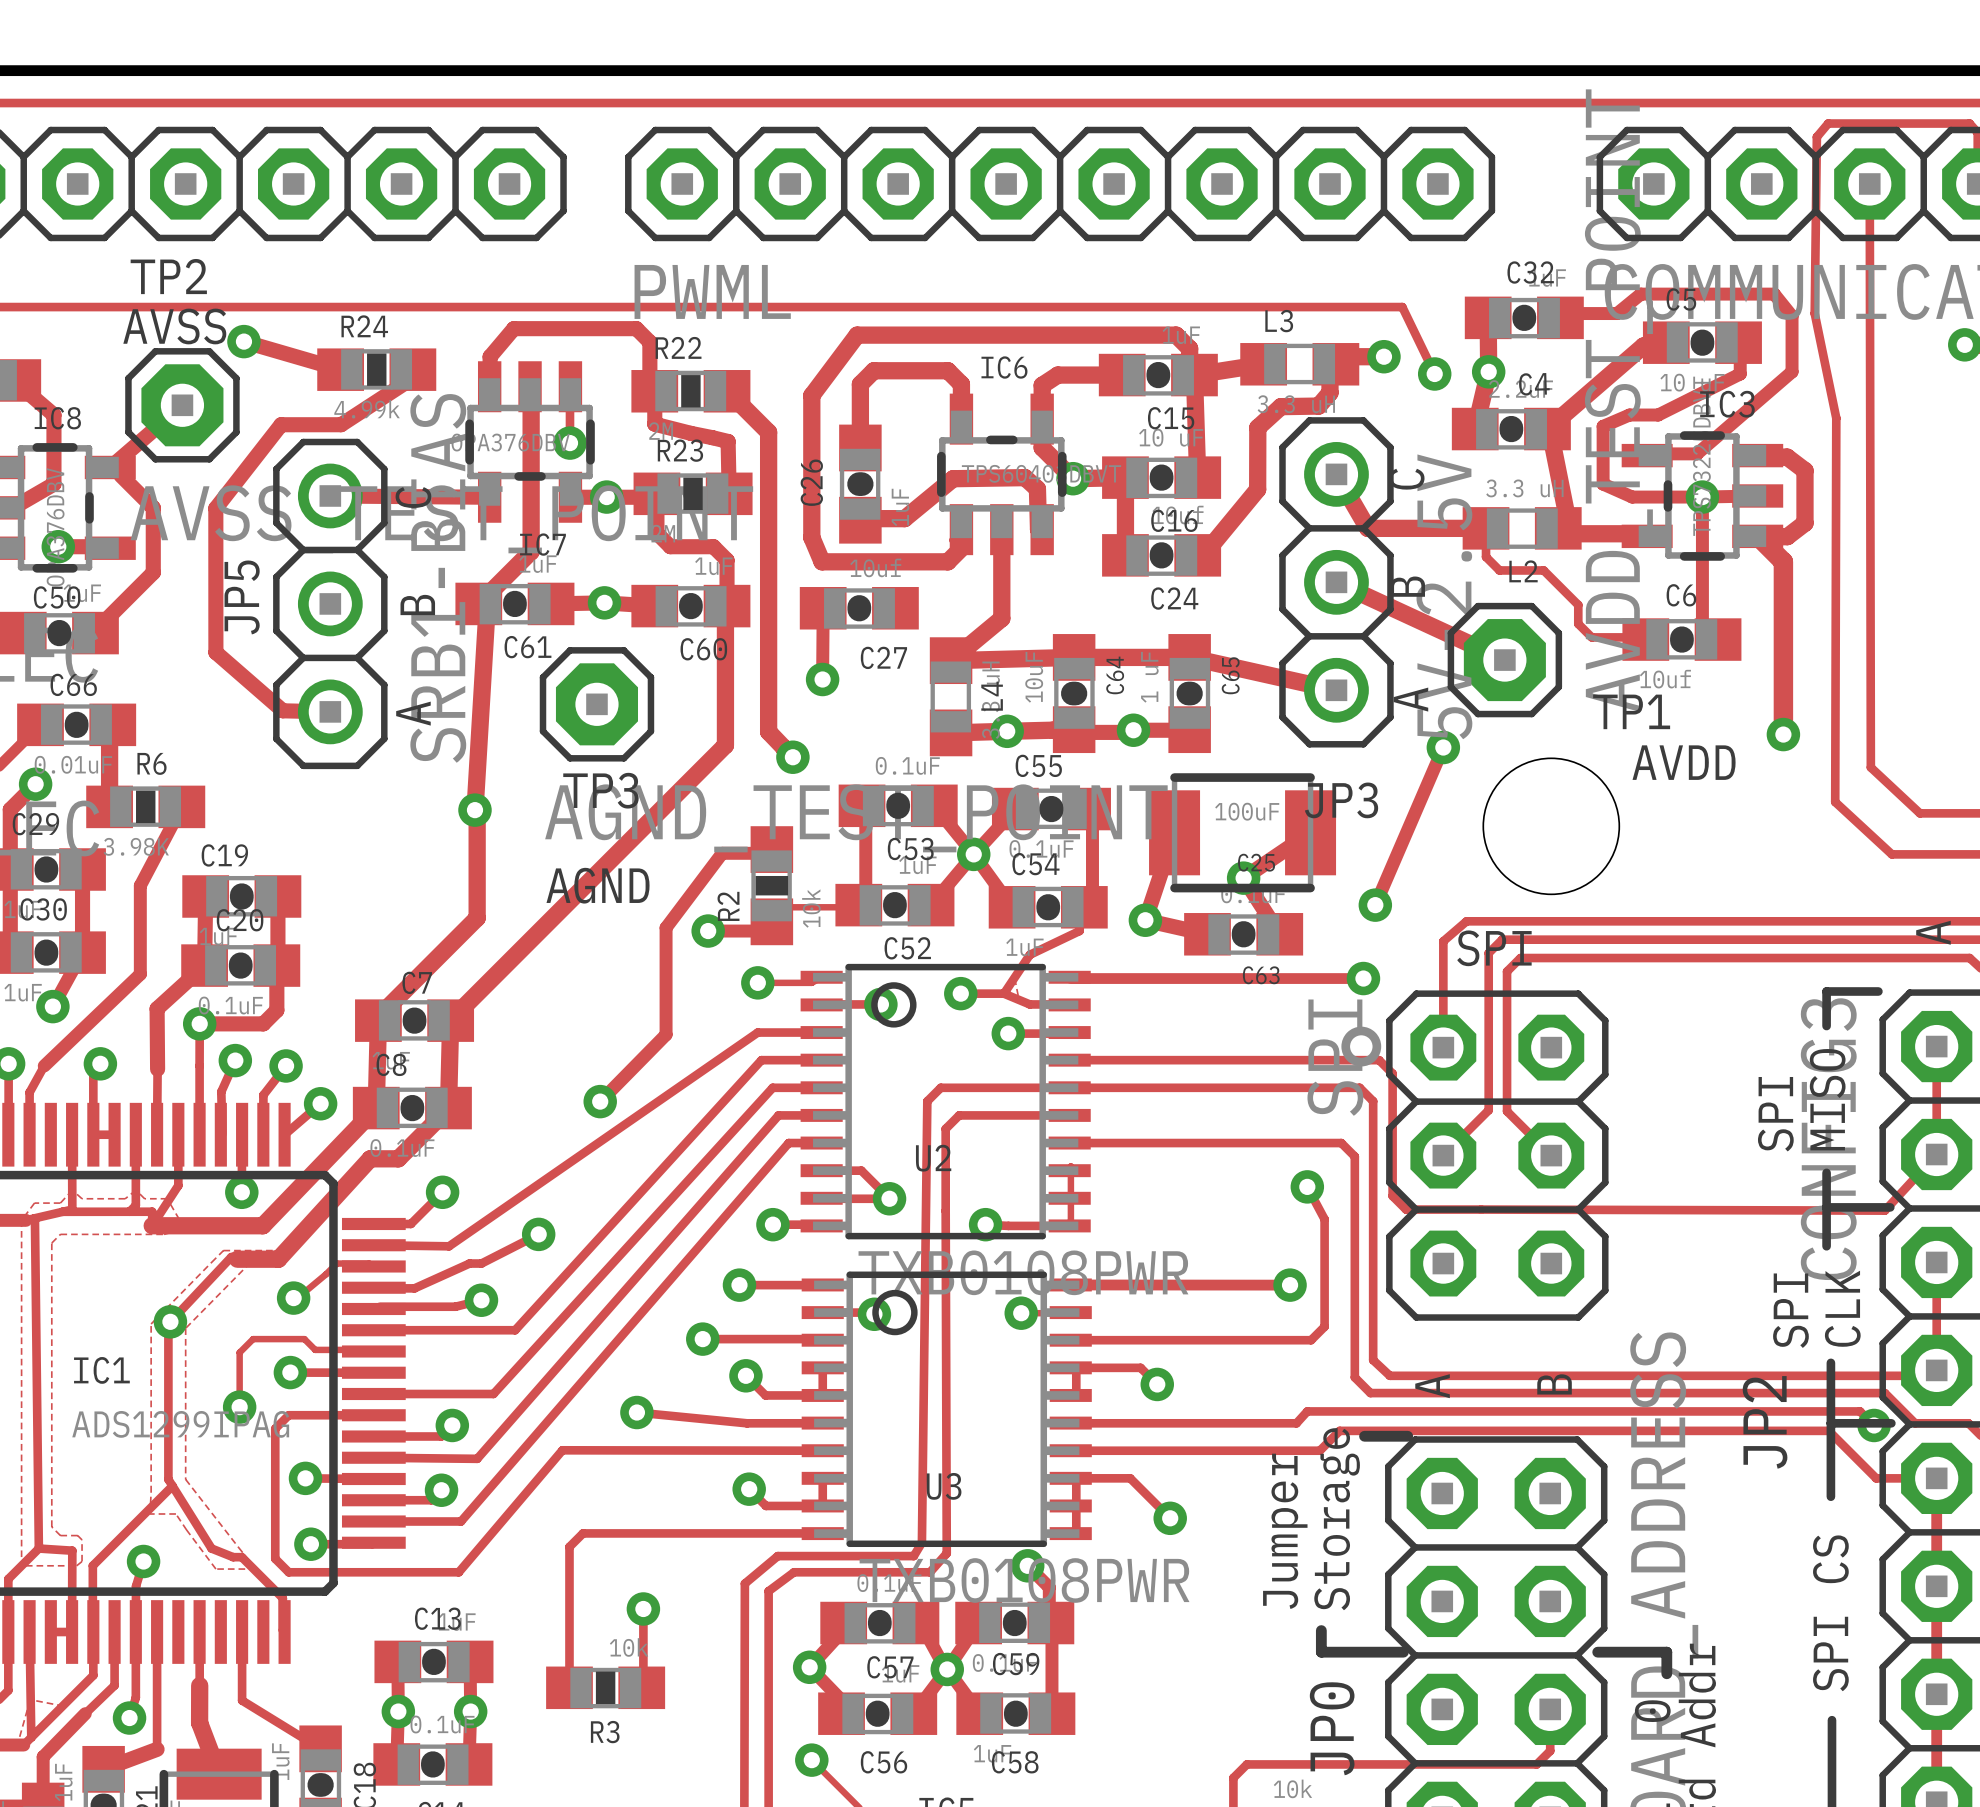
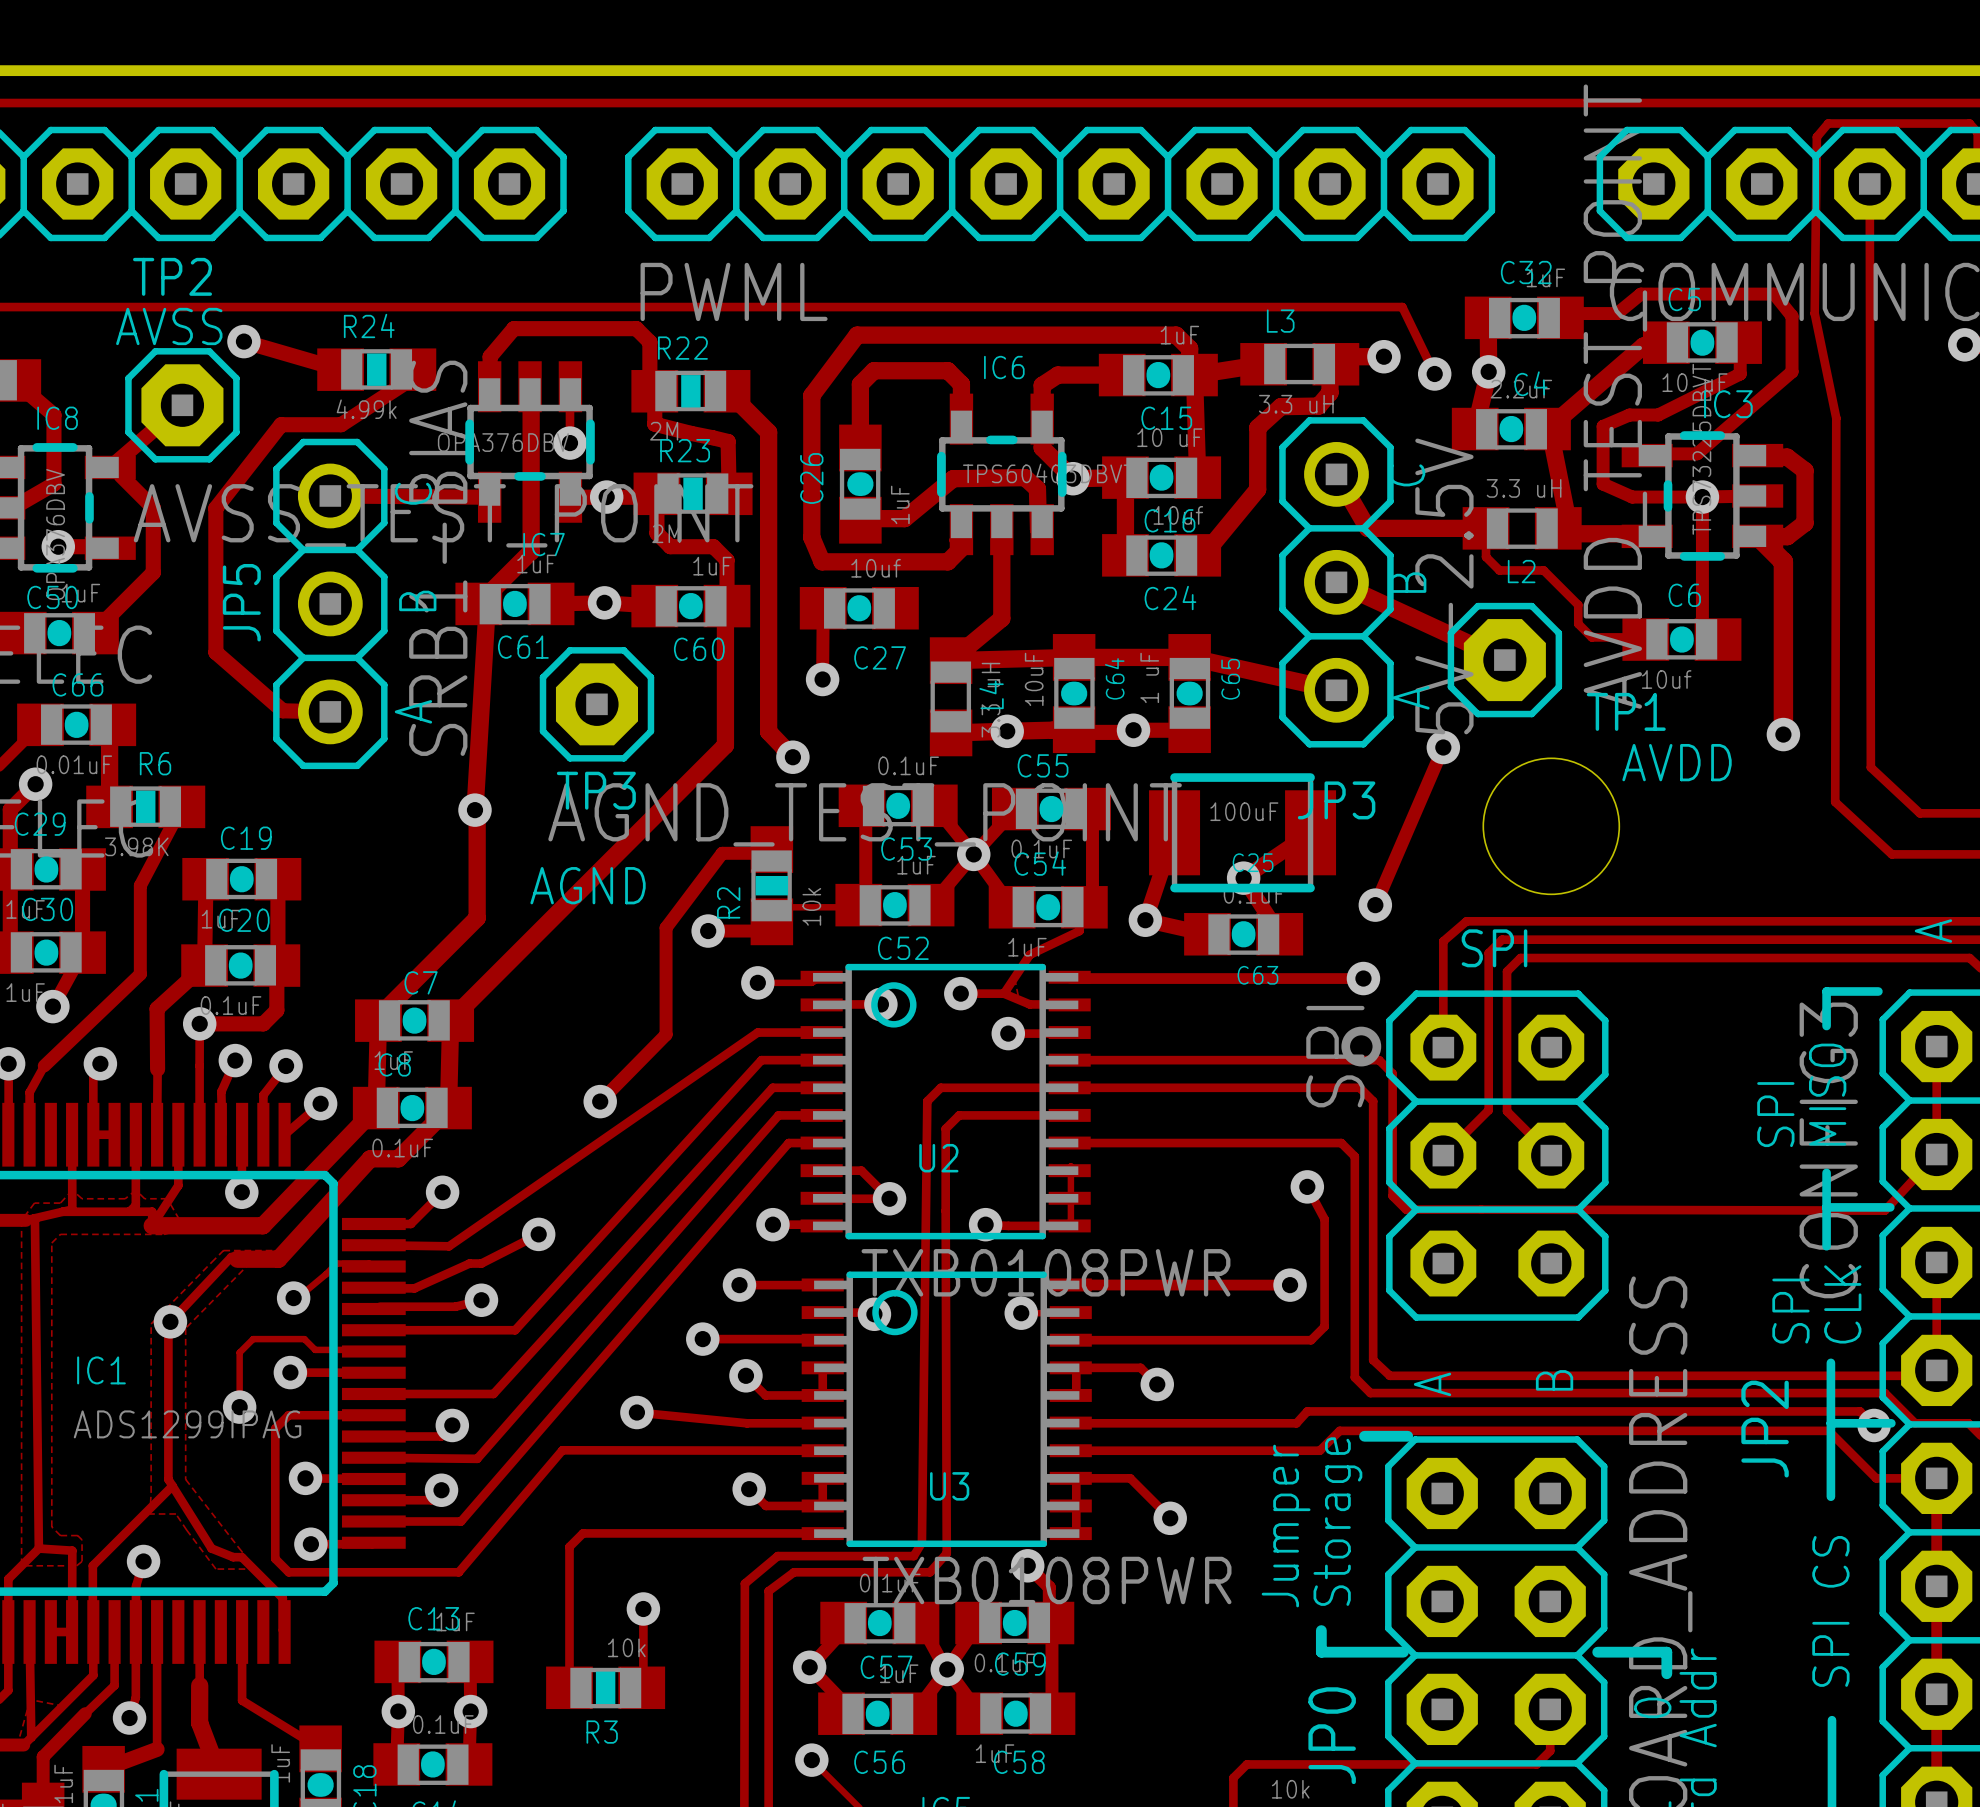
C19 name position: C19 (224, 855) -> C19 (246, 838)
C19 position: (241, 896) -> (241, 879)

